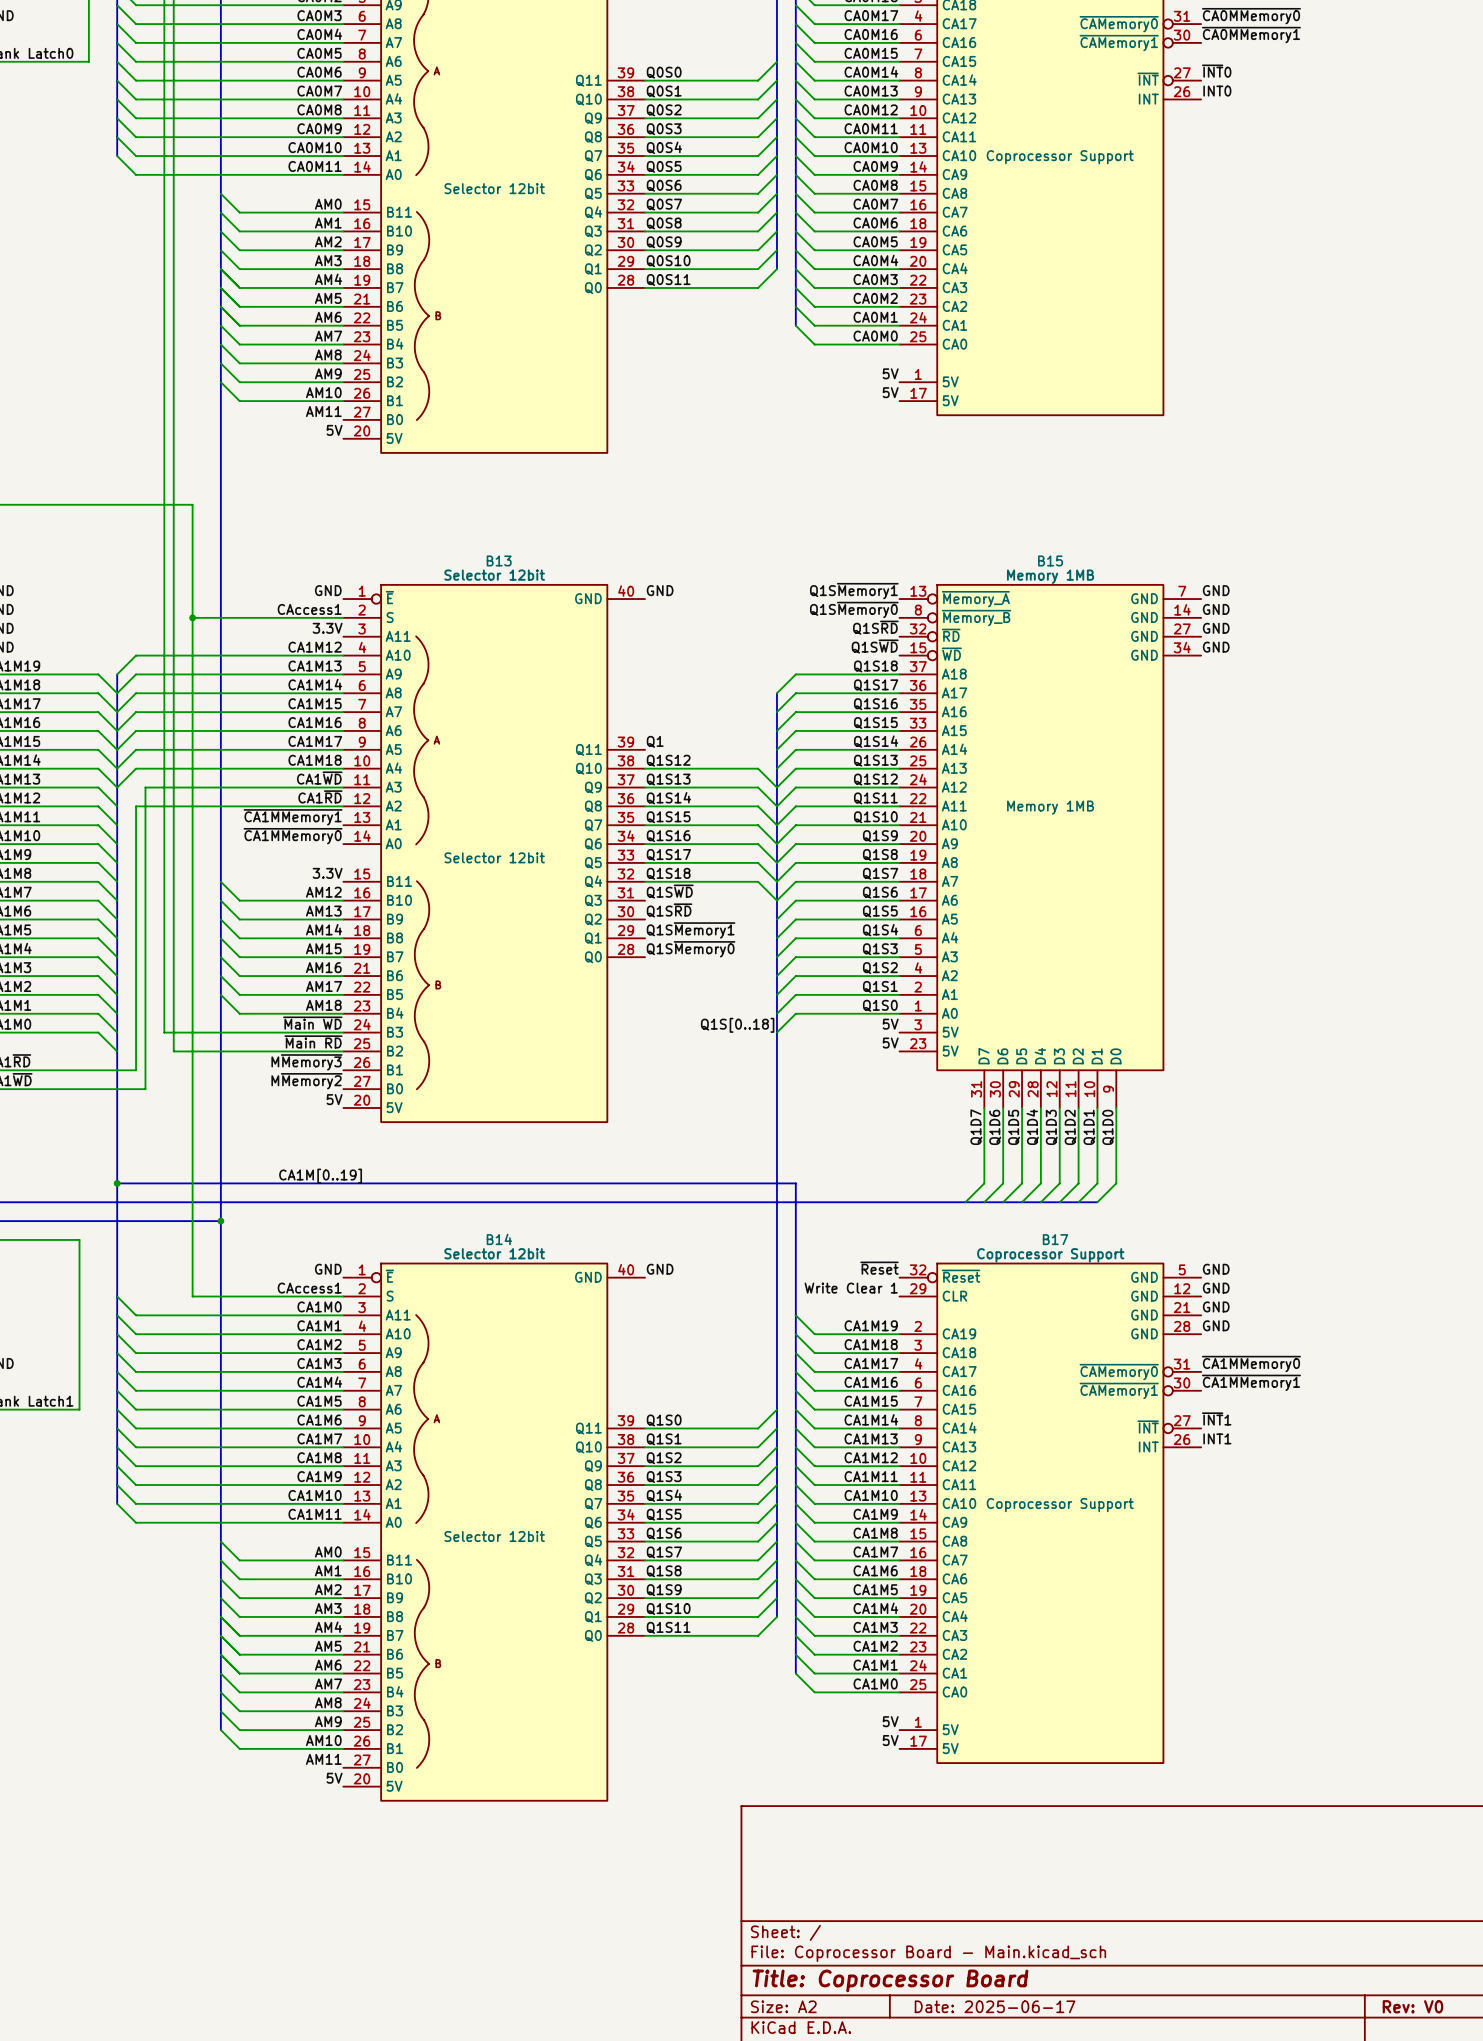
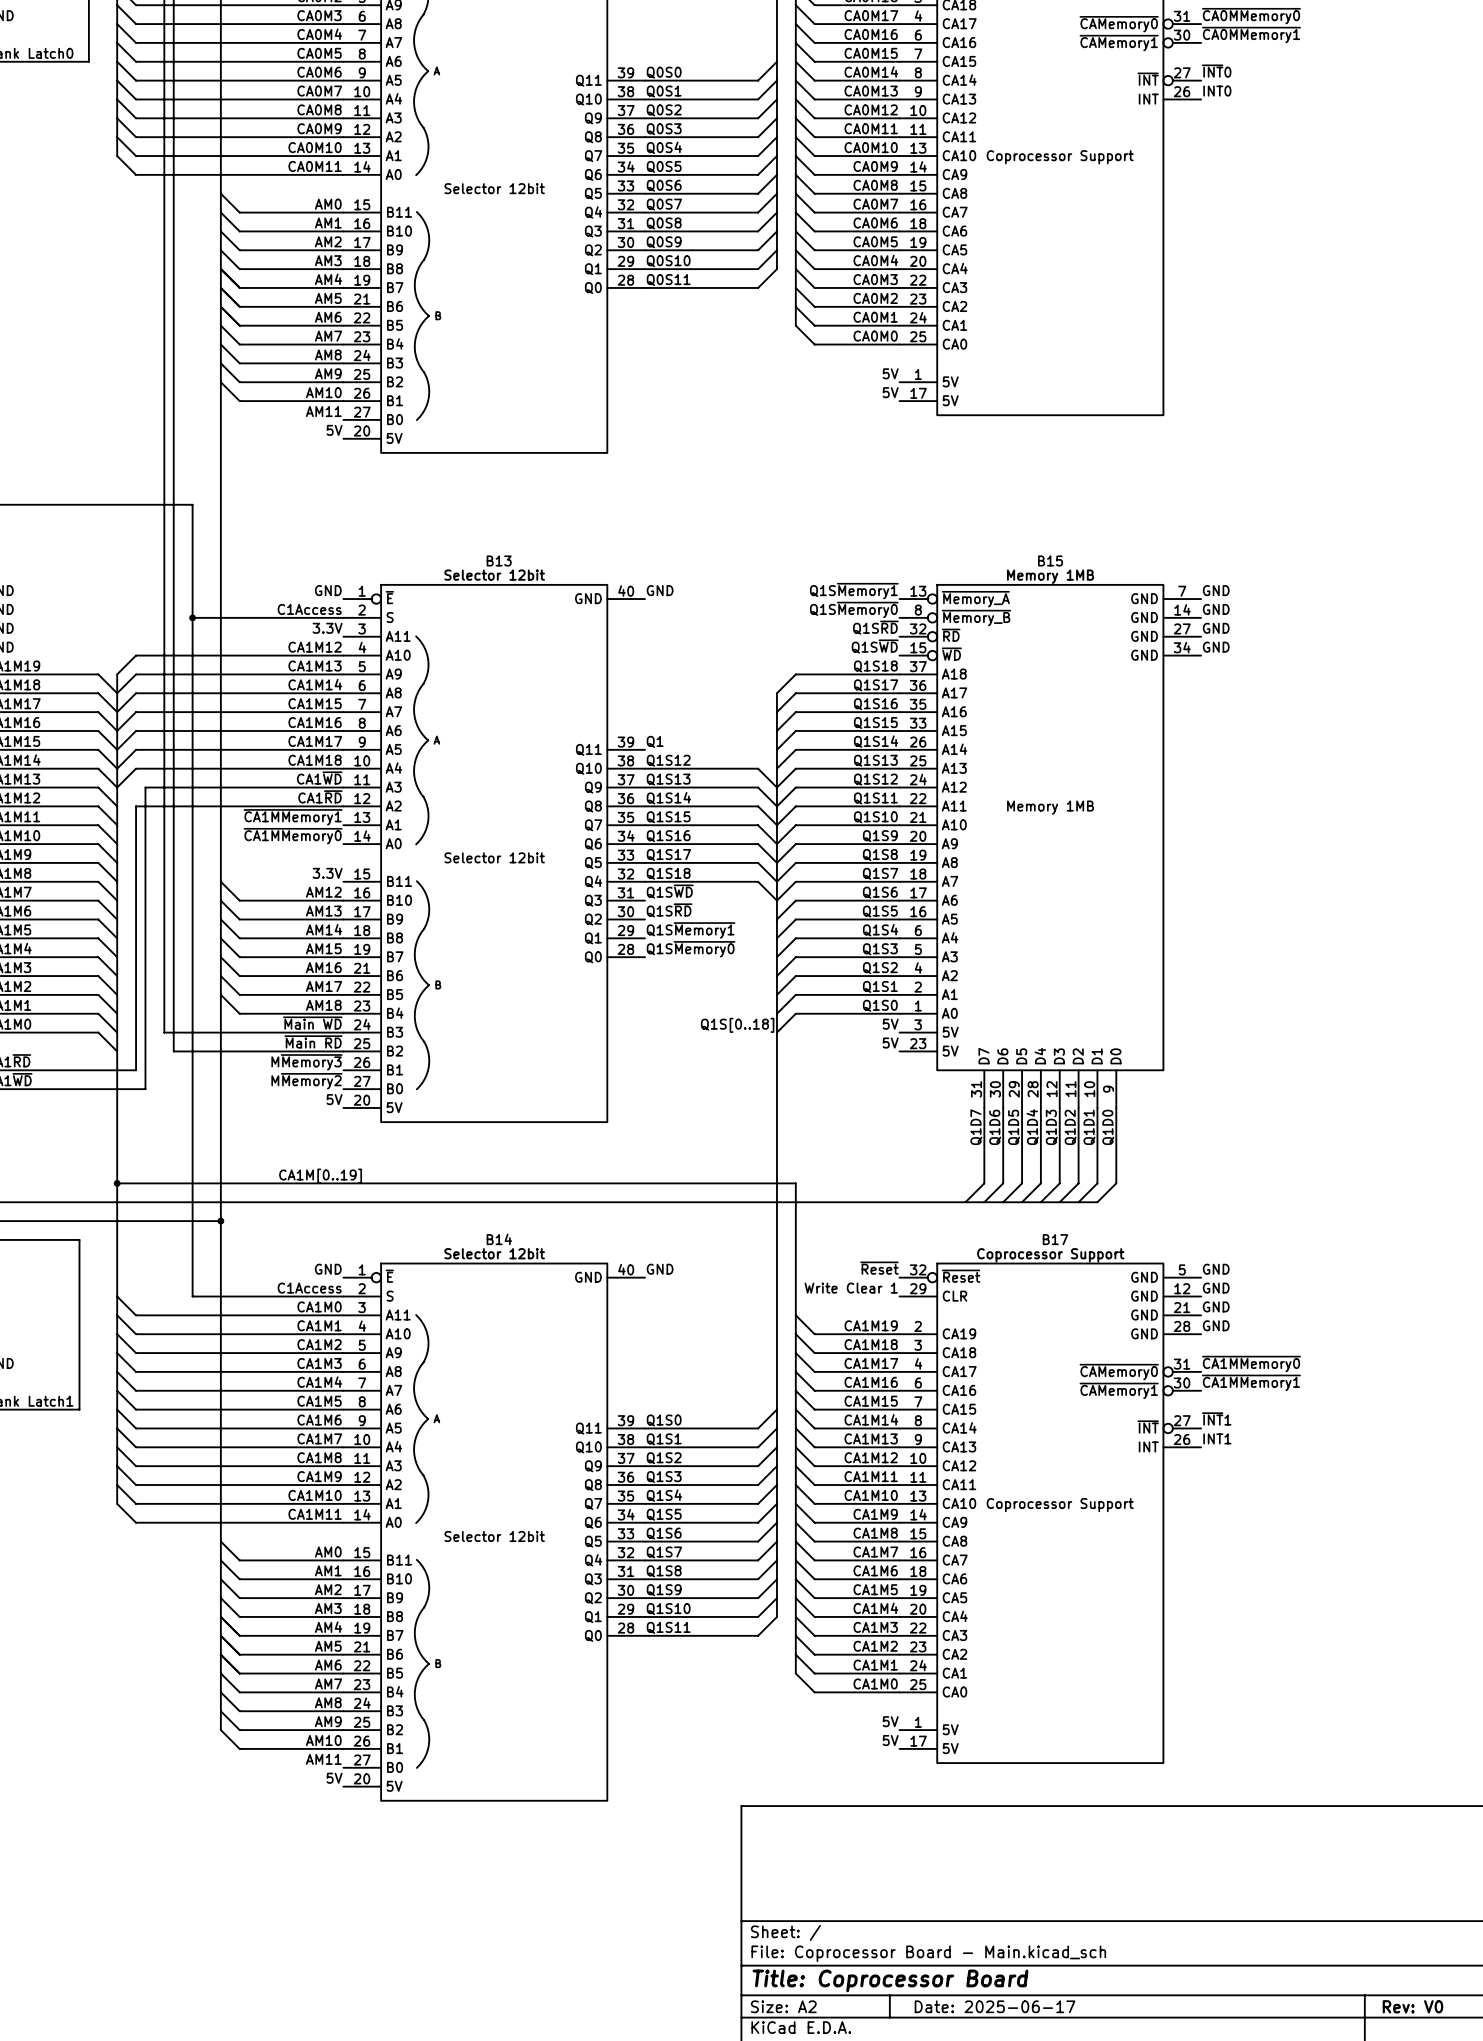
label: CAccess1 (309, 609) -> C1Access (309, 609)
label: CAccess1 (309, 1288) -> C1Access (309, 1288)

